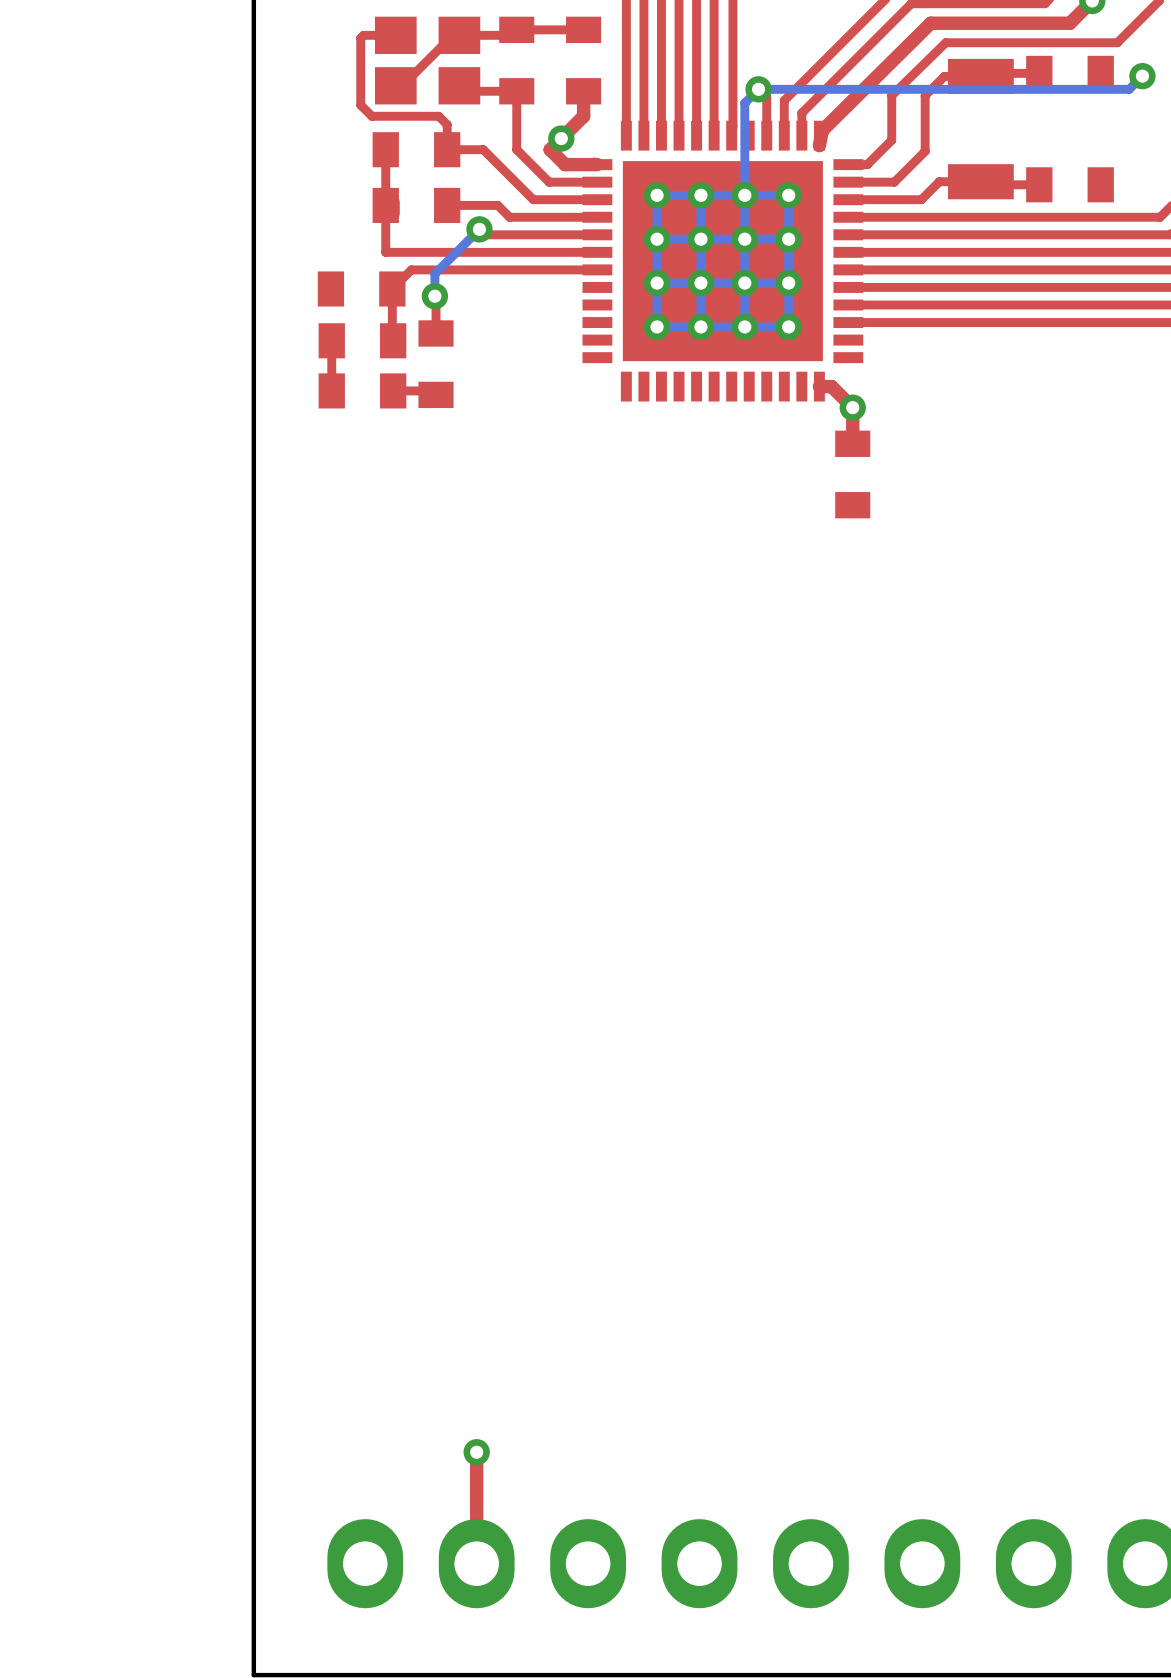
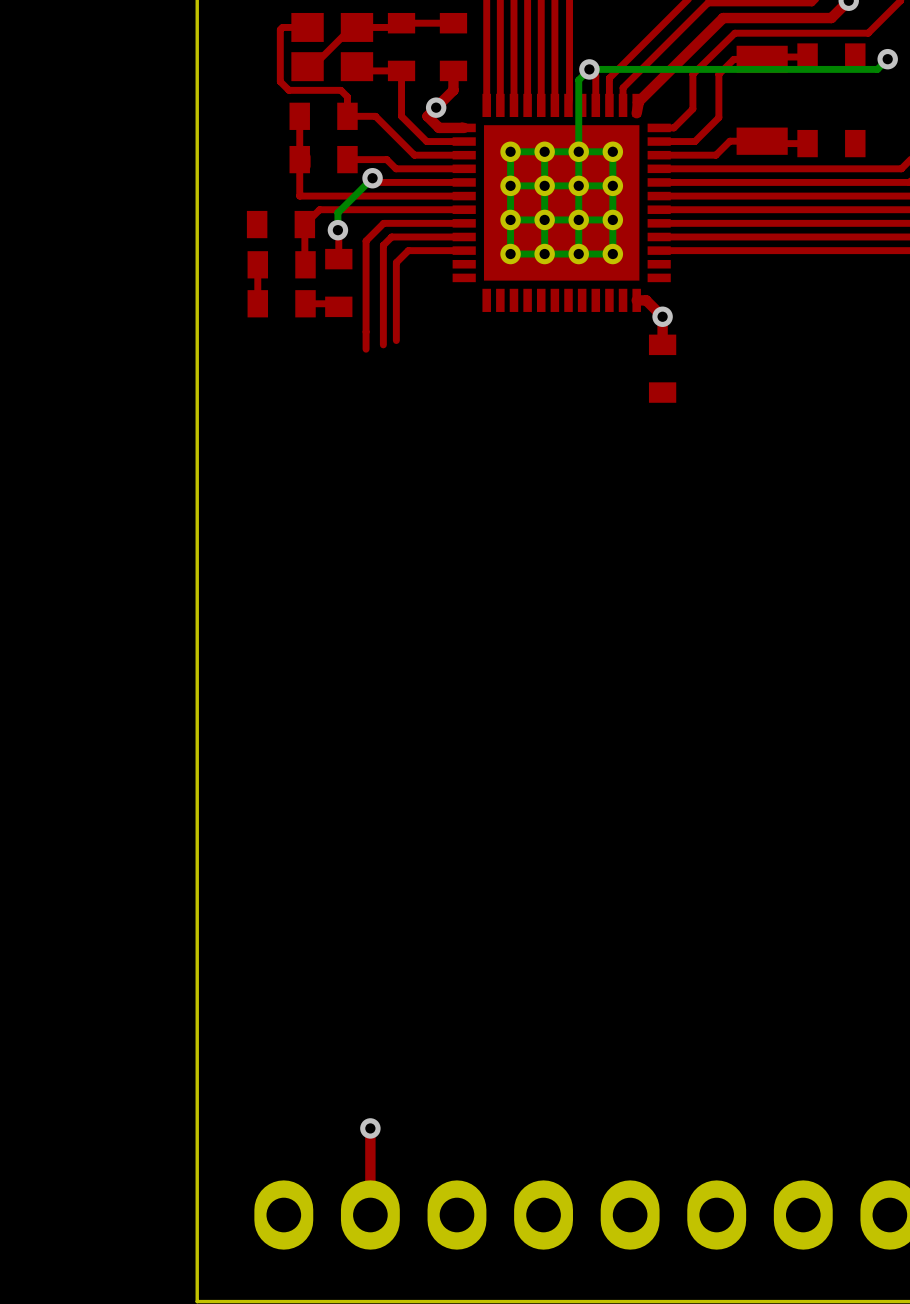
top track: none -> (464, 223) (383, 223) (366, 240) (366, 349)
top track: none -> (464, 236) (391, 236) (383, 245) (383, 344)
top track: none -> (464, 250) (408, 250) (396, 262) (396, 340)

